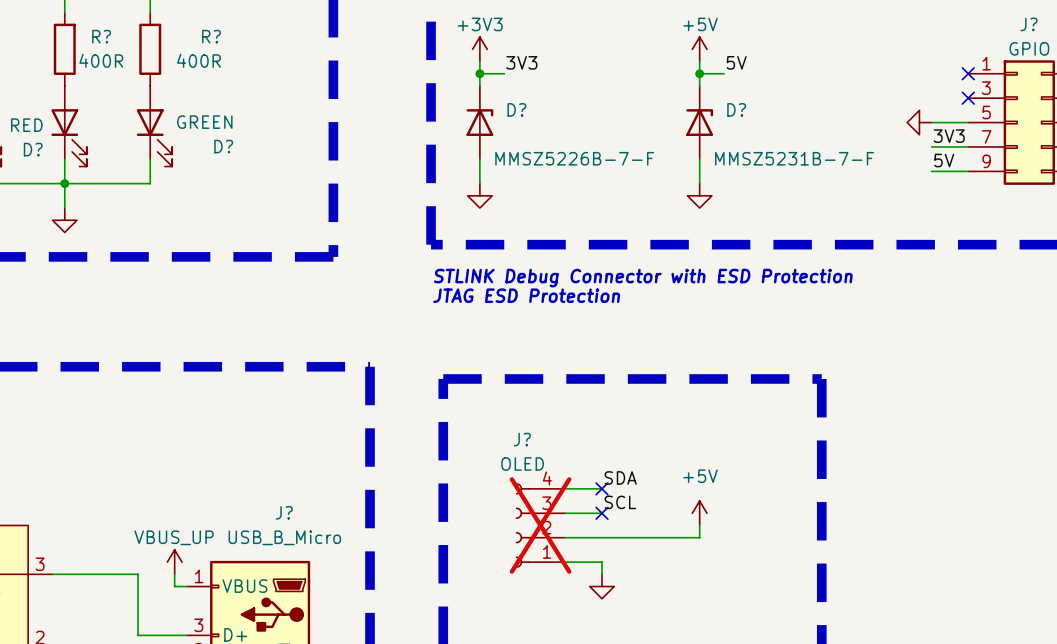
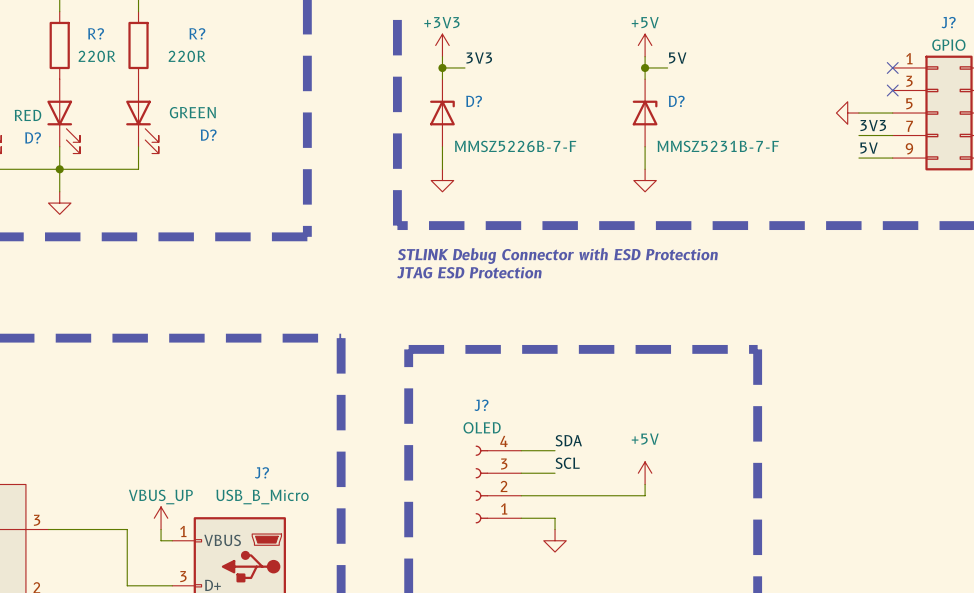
R? value: 400R (101, 60) -> 220R (97, 56)
R? value: 400R (198, 60) -> 220R (187, 56)
no-connect mark: (601, 488) -> none
no-connect mark: (601, 513) -> none
J? do-not-place cross: (540, 525) -> none

